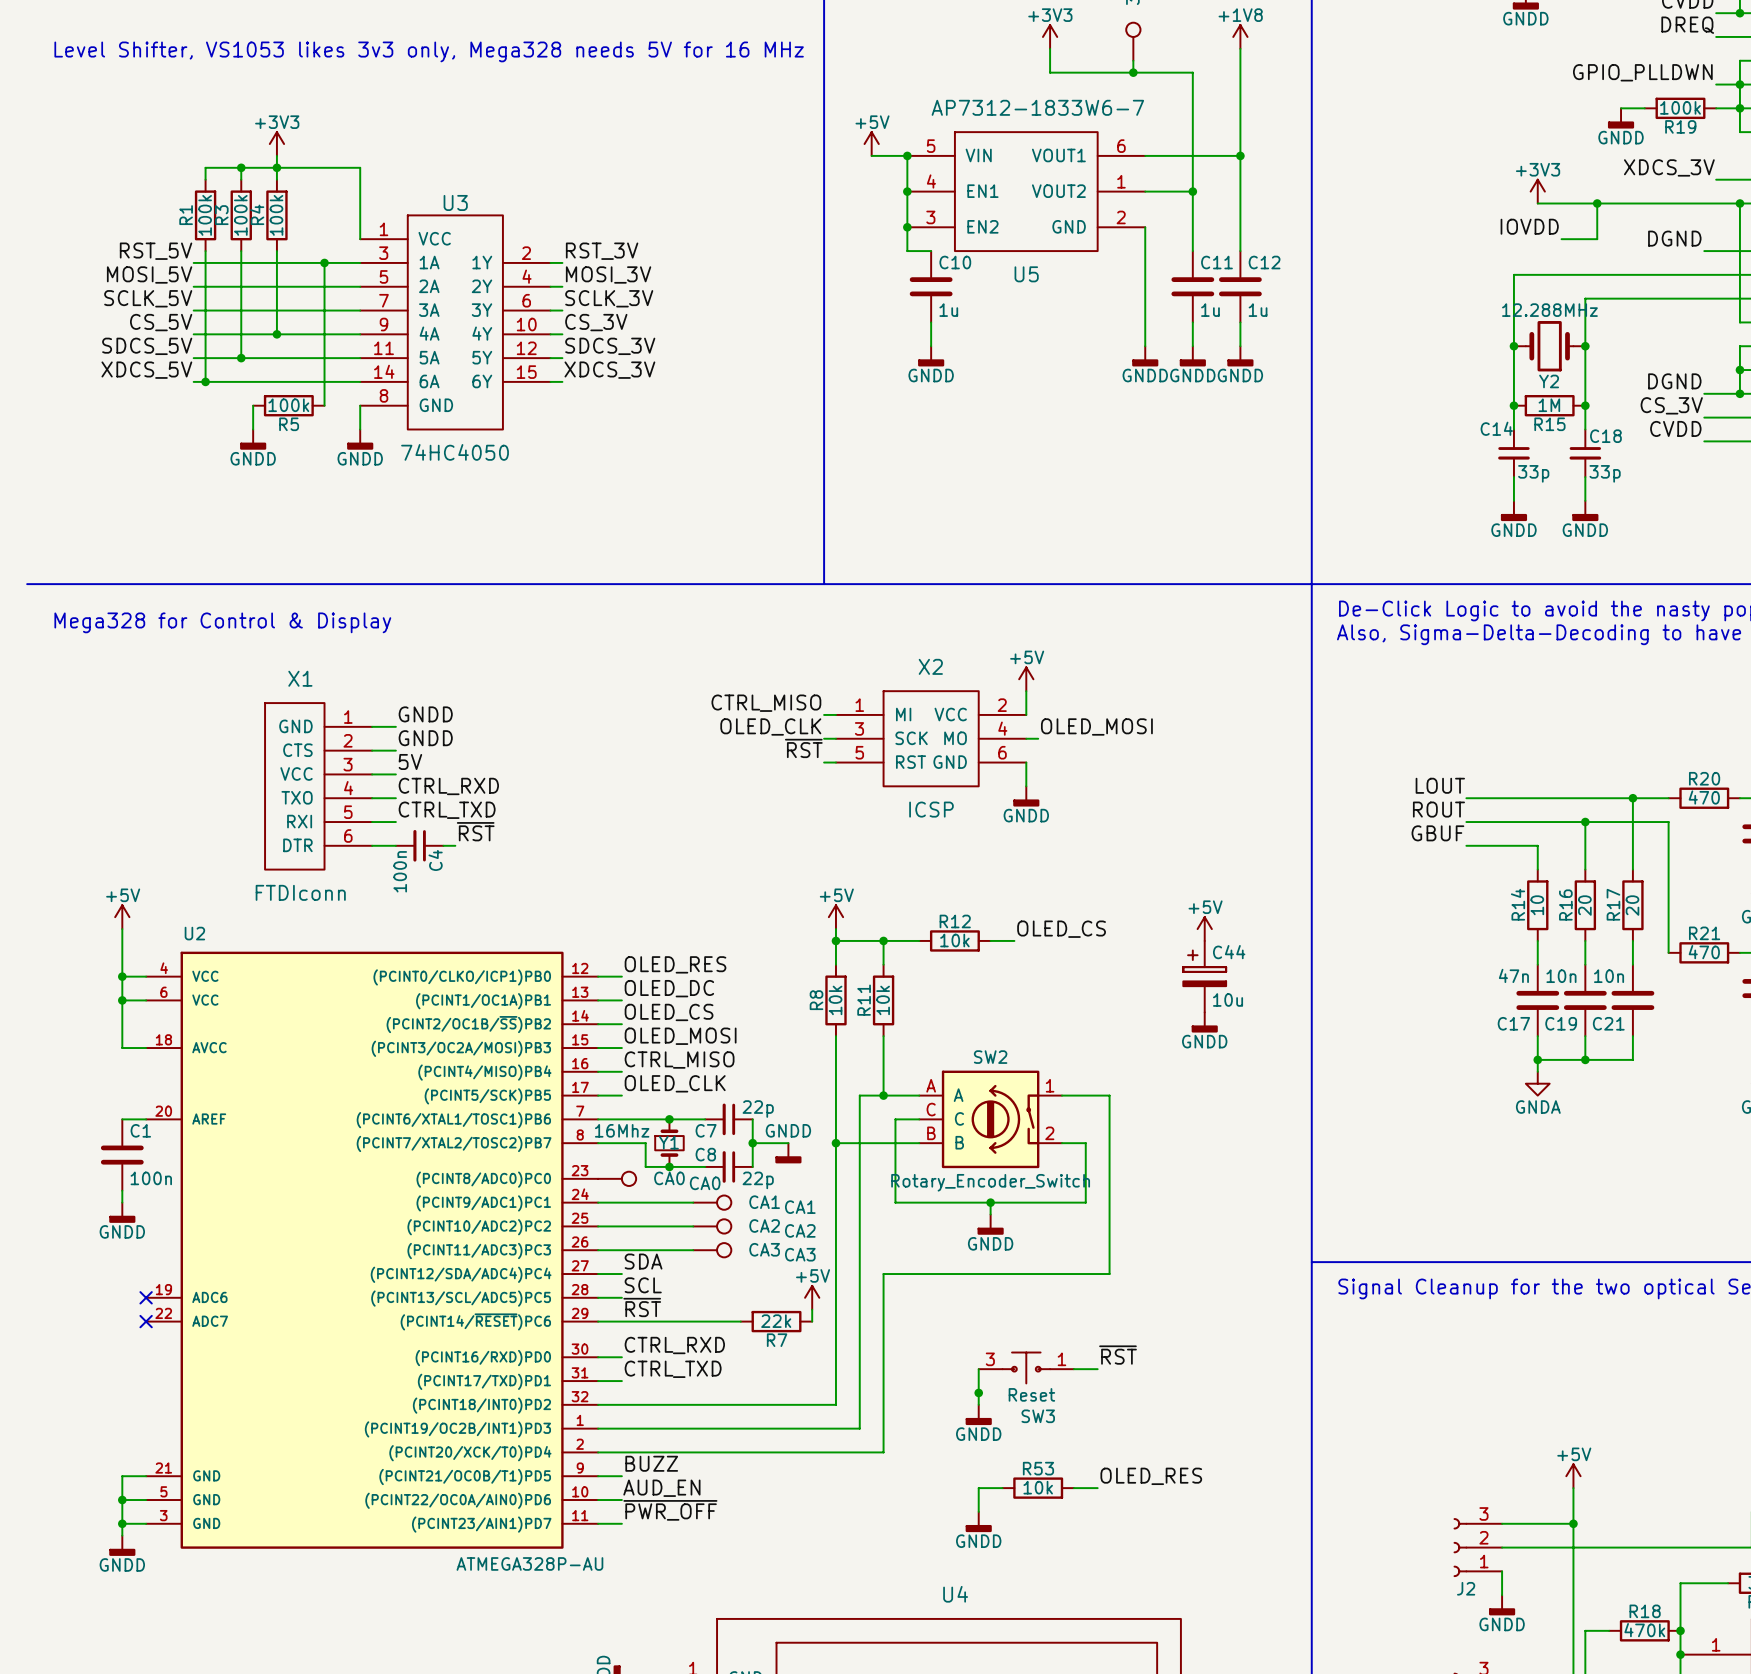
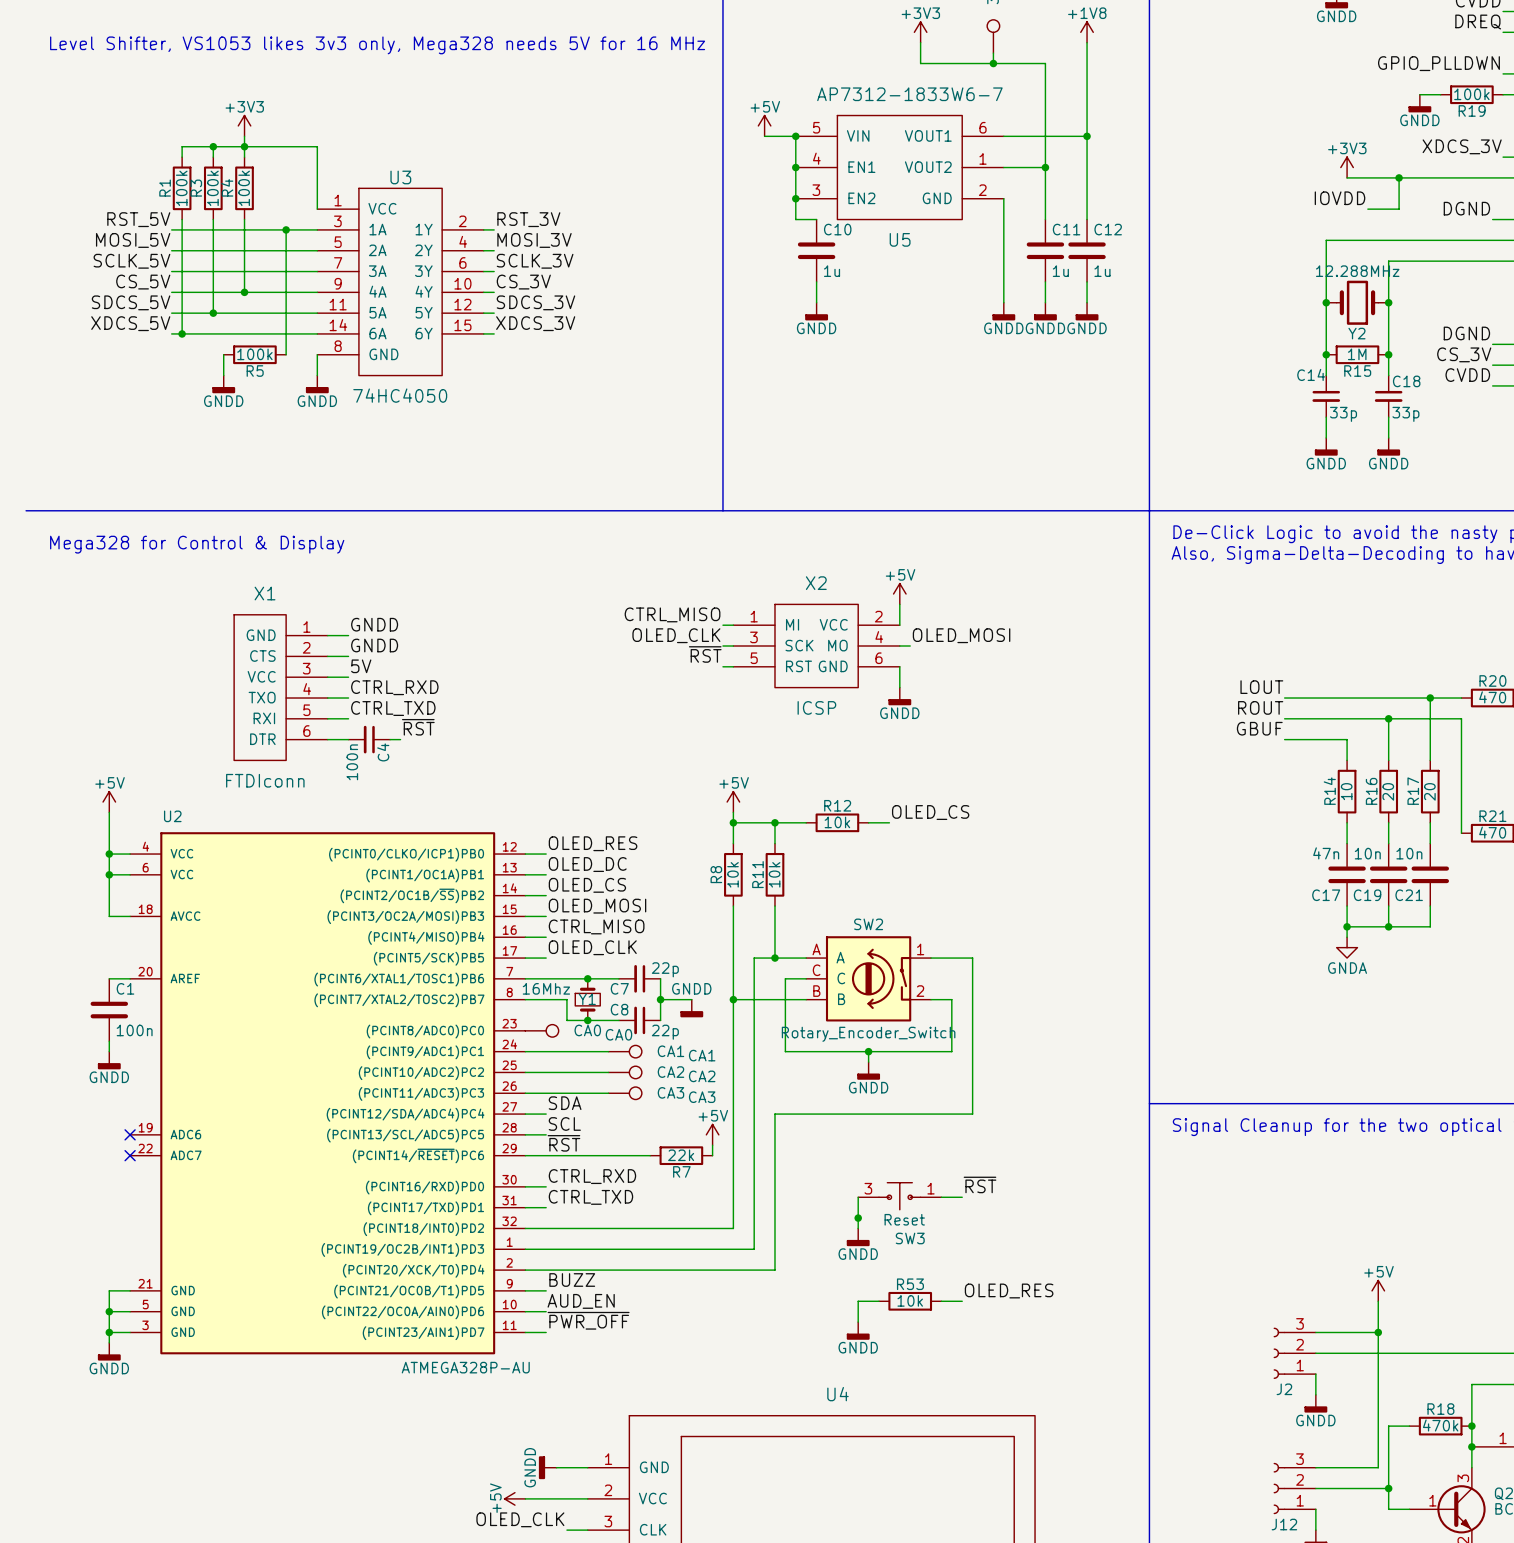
power symbol: +5V (1204, 929) -> none
C44: 10u (1204, 976) -> none
power symbol: GNDD (1204, 1022) -> none

